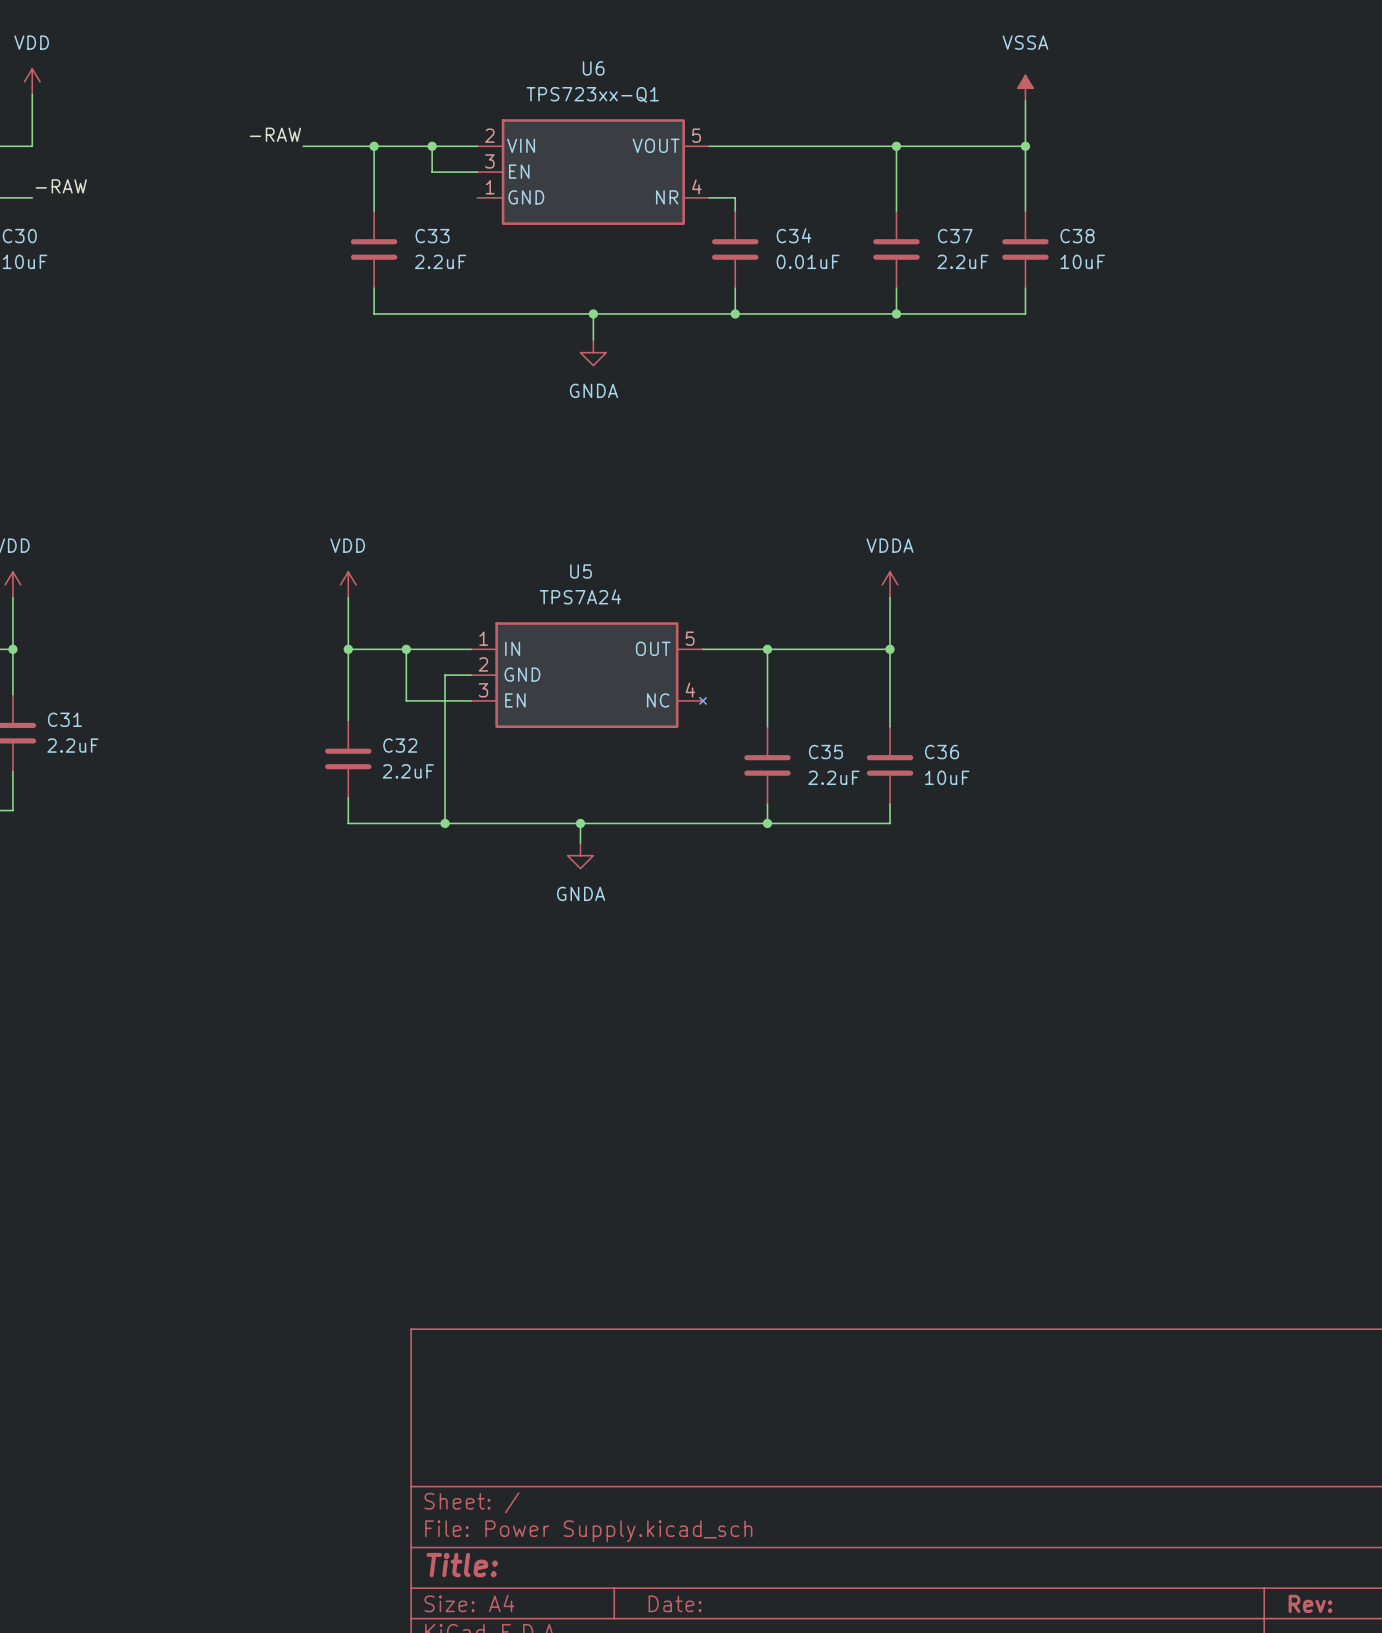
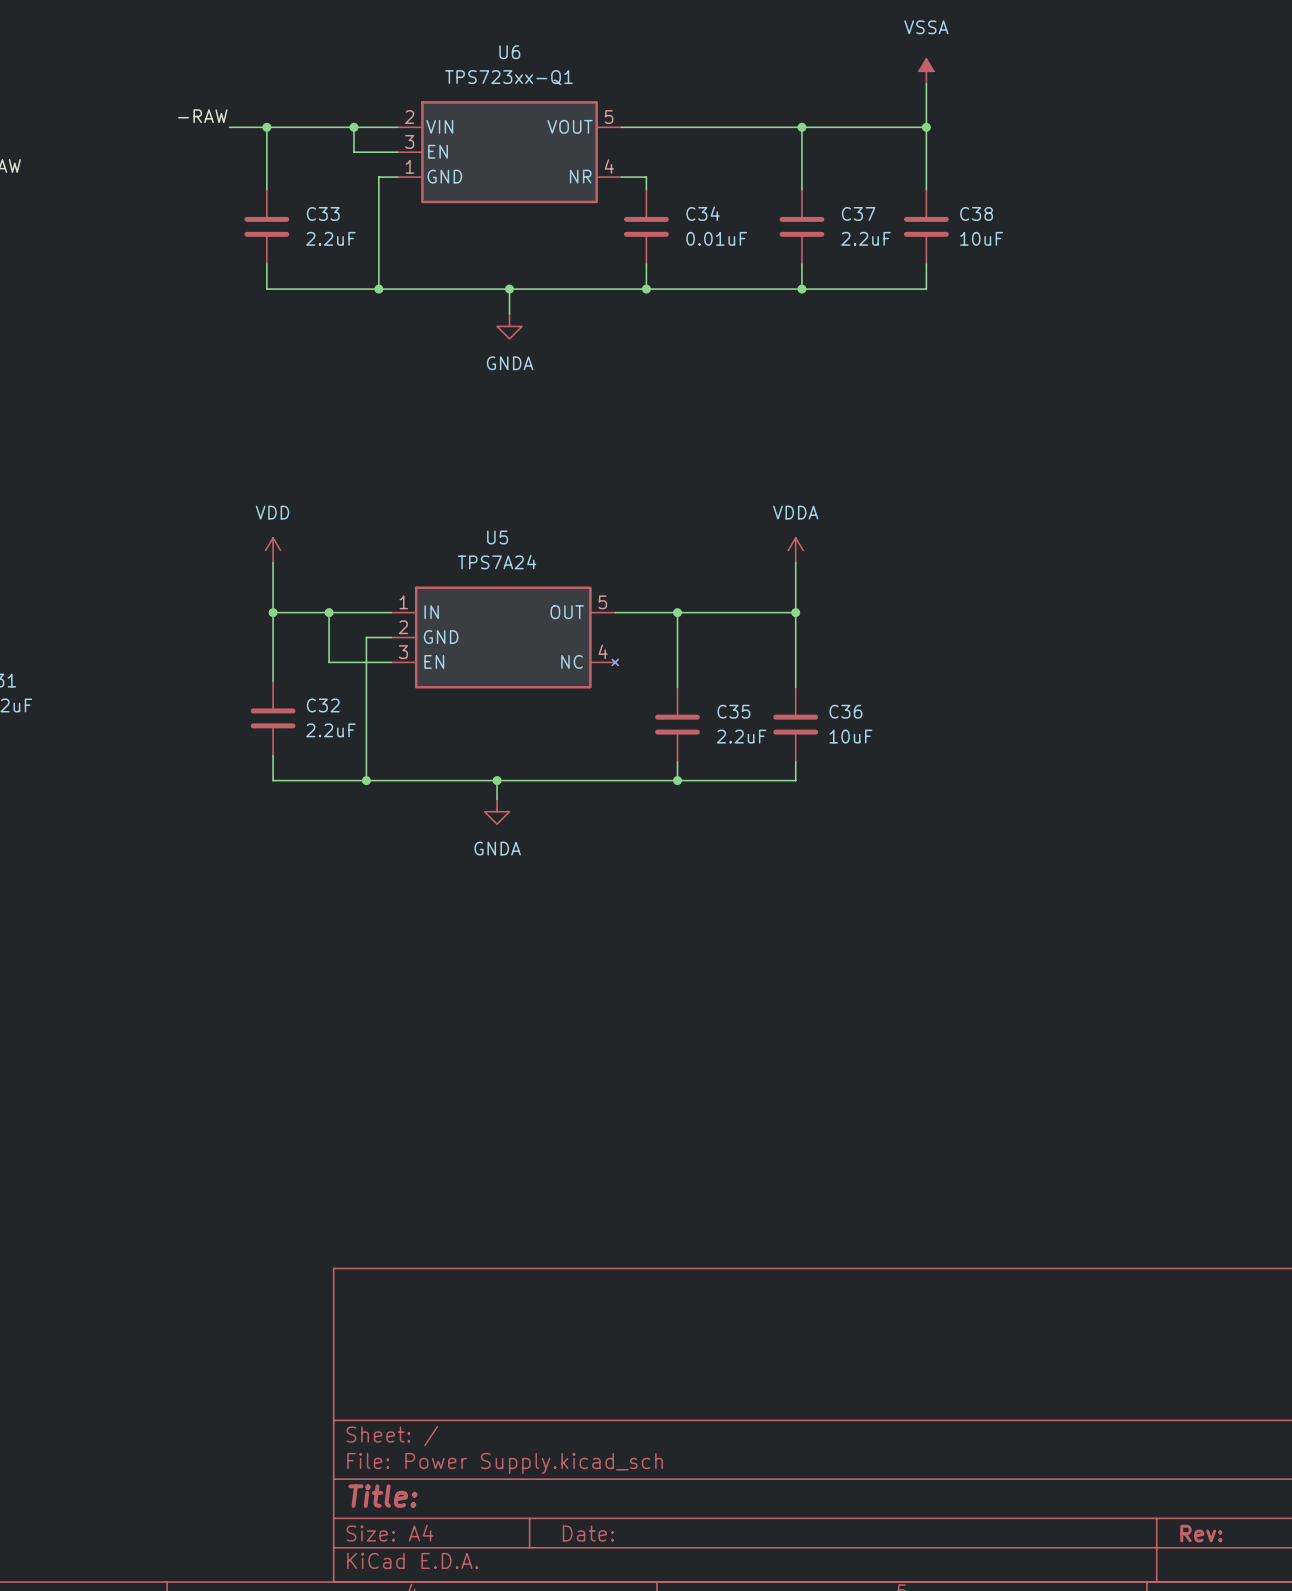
wire: (374, 146) (374, 210) -> (266, 127) (266, 189)
junction position: (374, 146) -> (266, 127)
wire: none -> (397, 177) (378, 177) (378, 289)
C33 position: (374, 249) -> (266, 226)
wire: (374, 288) (374, 313) -> (266, 264) (266, 289) (297, 289)
junction: none -> (378, 289)

